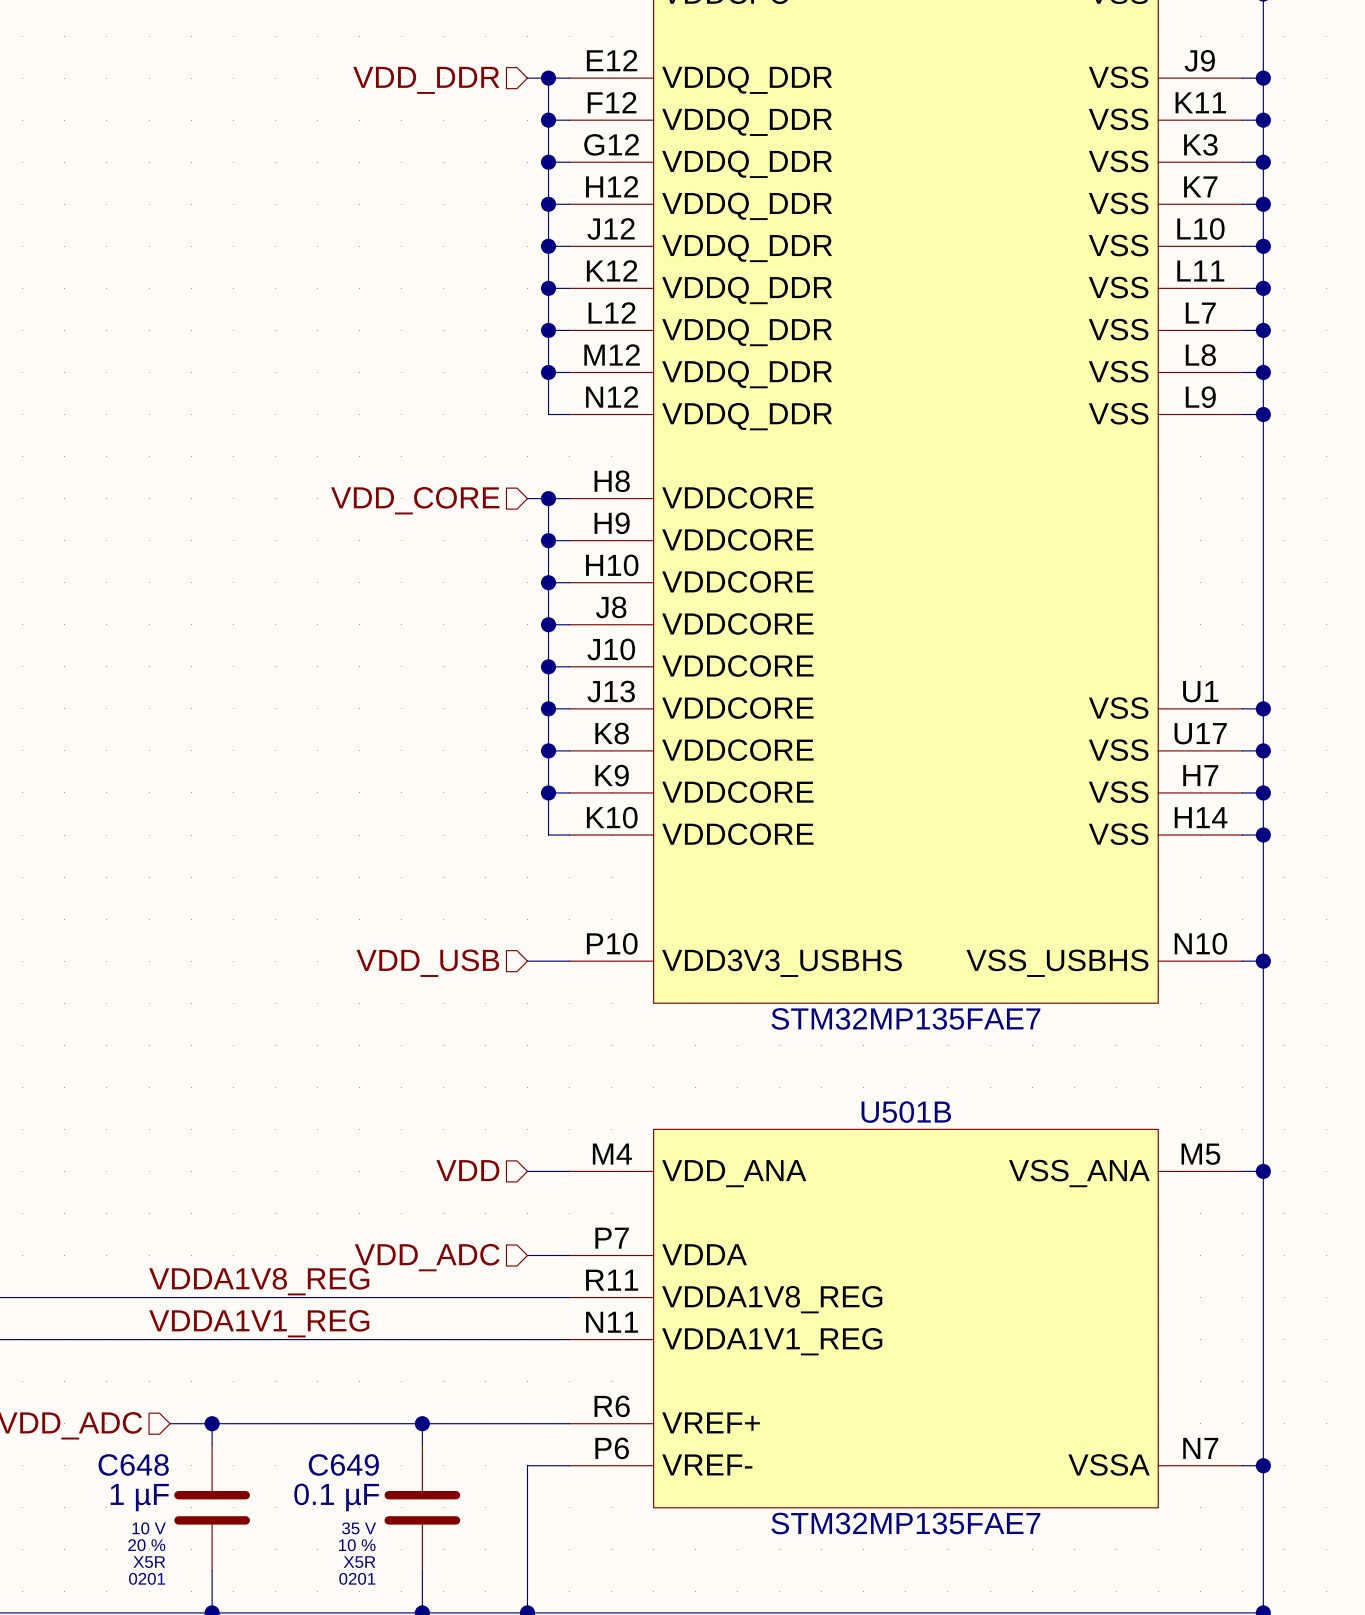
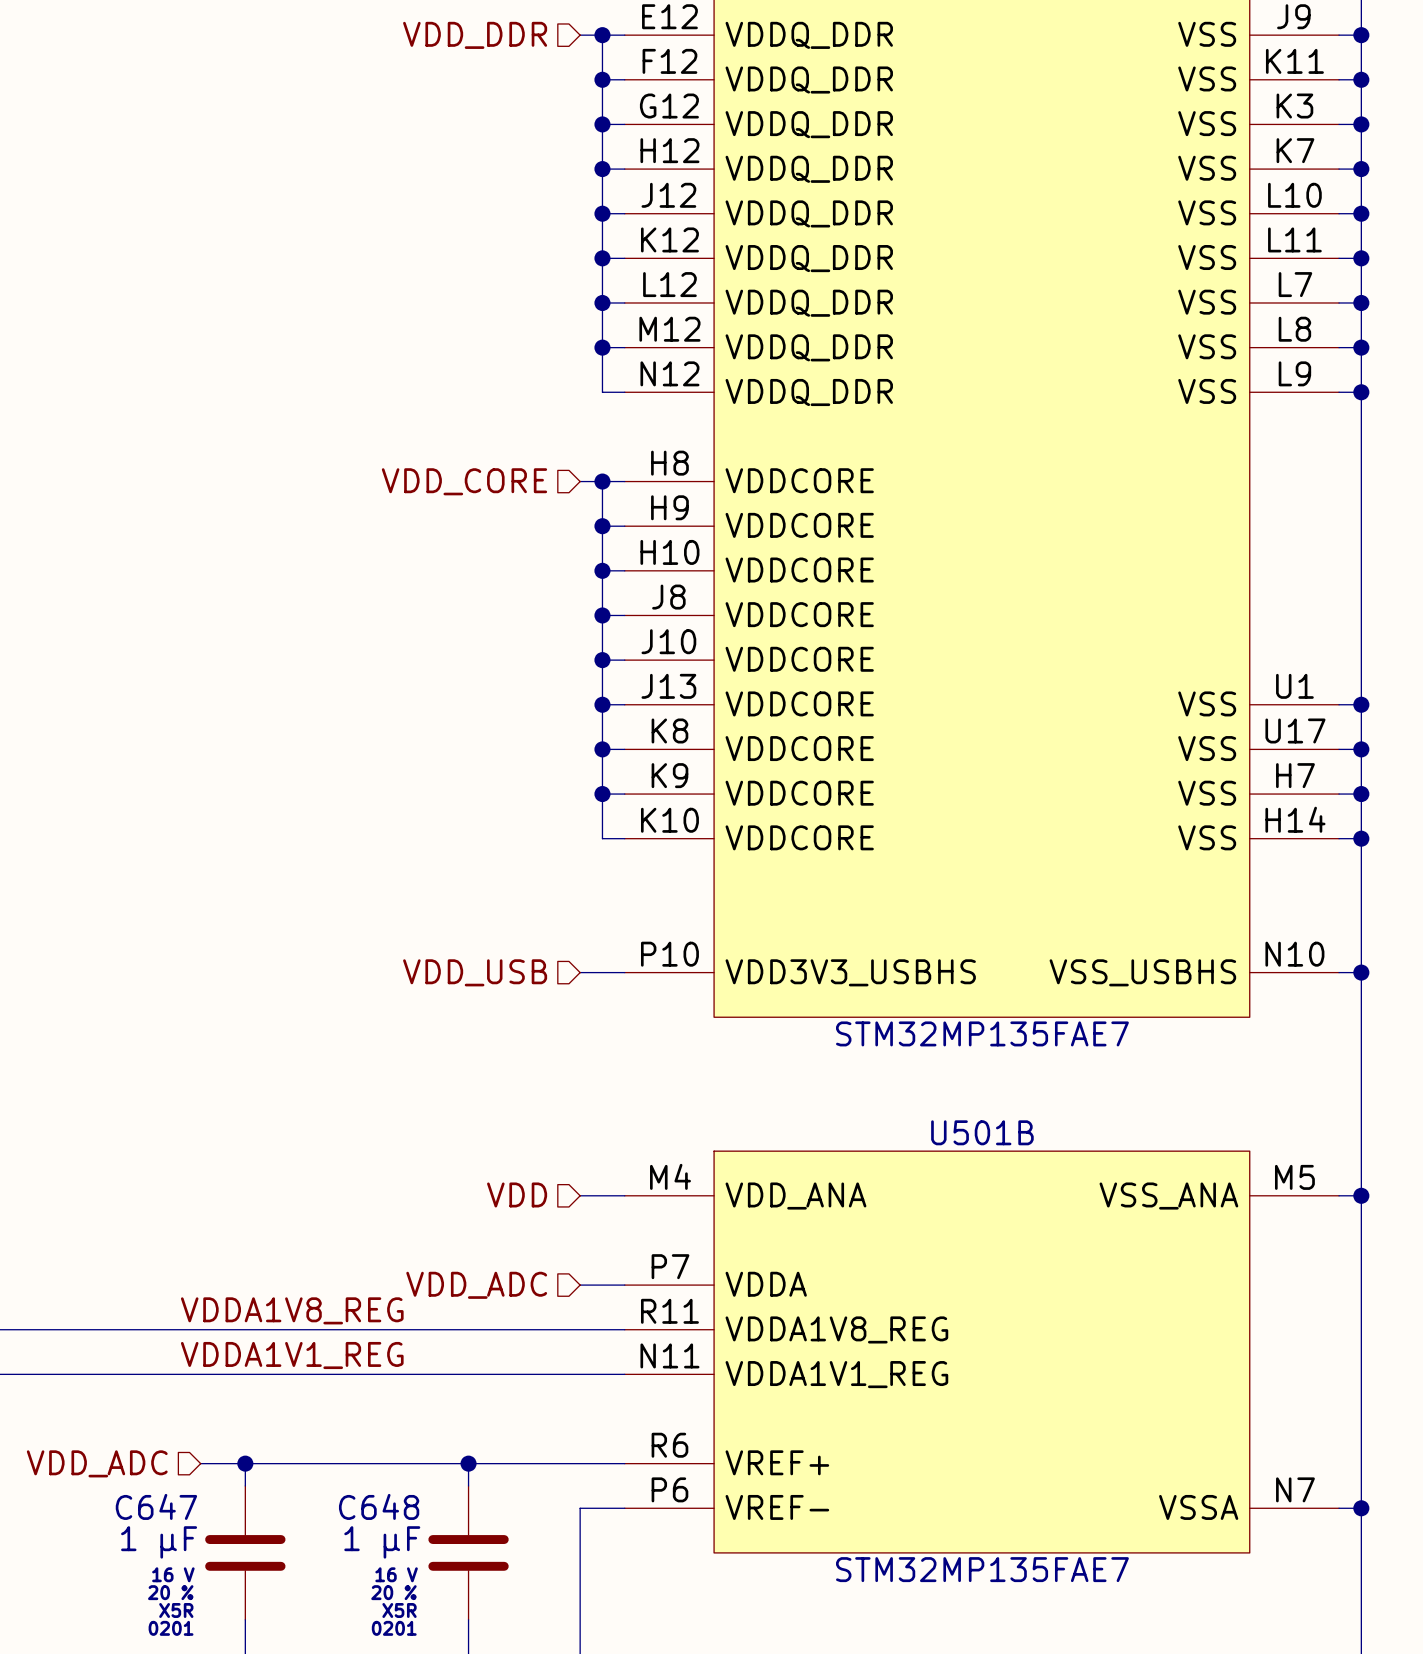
C648 name: C648 (133, 1464) -> C647 (156, 1506)
C649 name: C649 (343, 1464) -> C648 (379, 1506)
C649 value: 0.1 µF (336, 1497) -> 1 µF (382, 1542)
C648 text: 10 V (149, 1528) -> 16 V (173, 1574)
C649 text: 35 V (359, 1528) -> 16 V (396, 1574)
C649 text: 10 % (357, 1545) -> 20 % (393, 1592)

